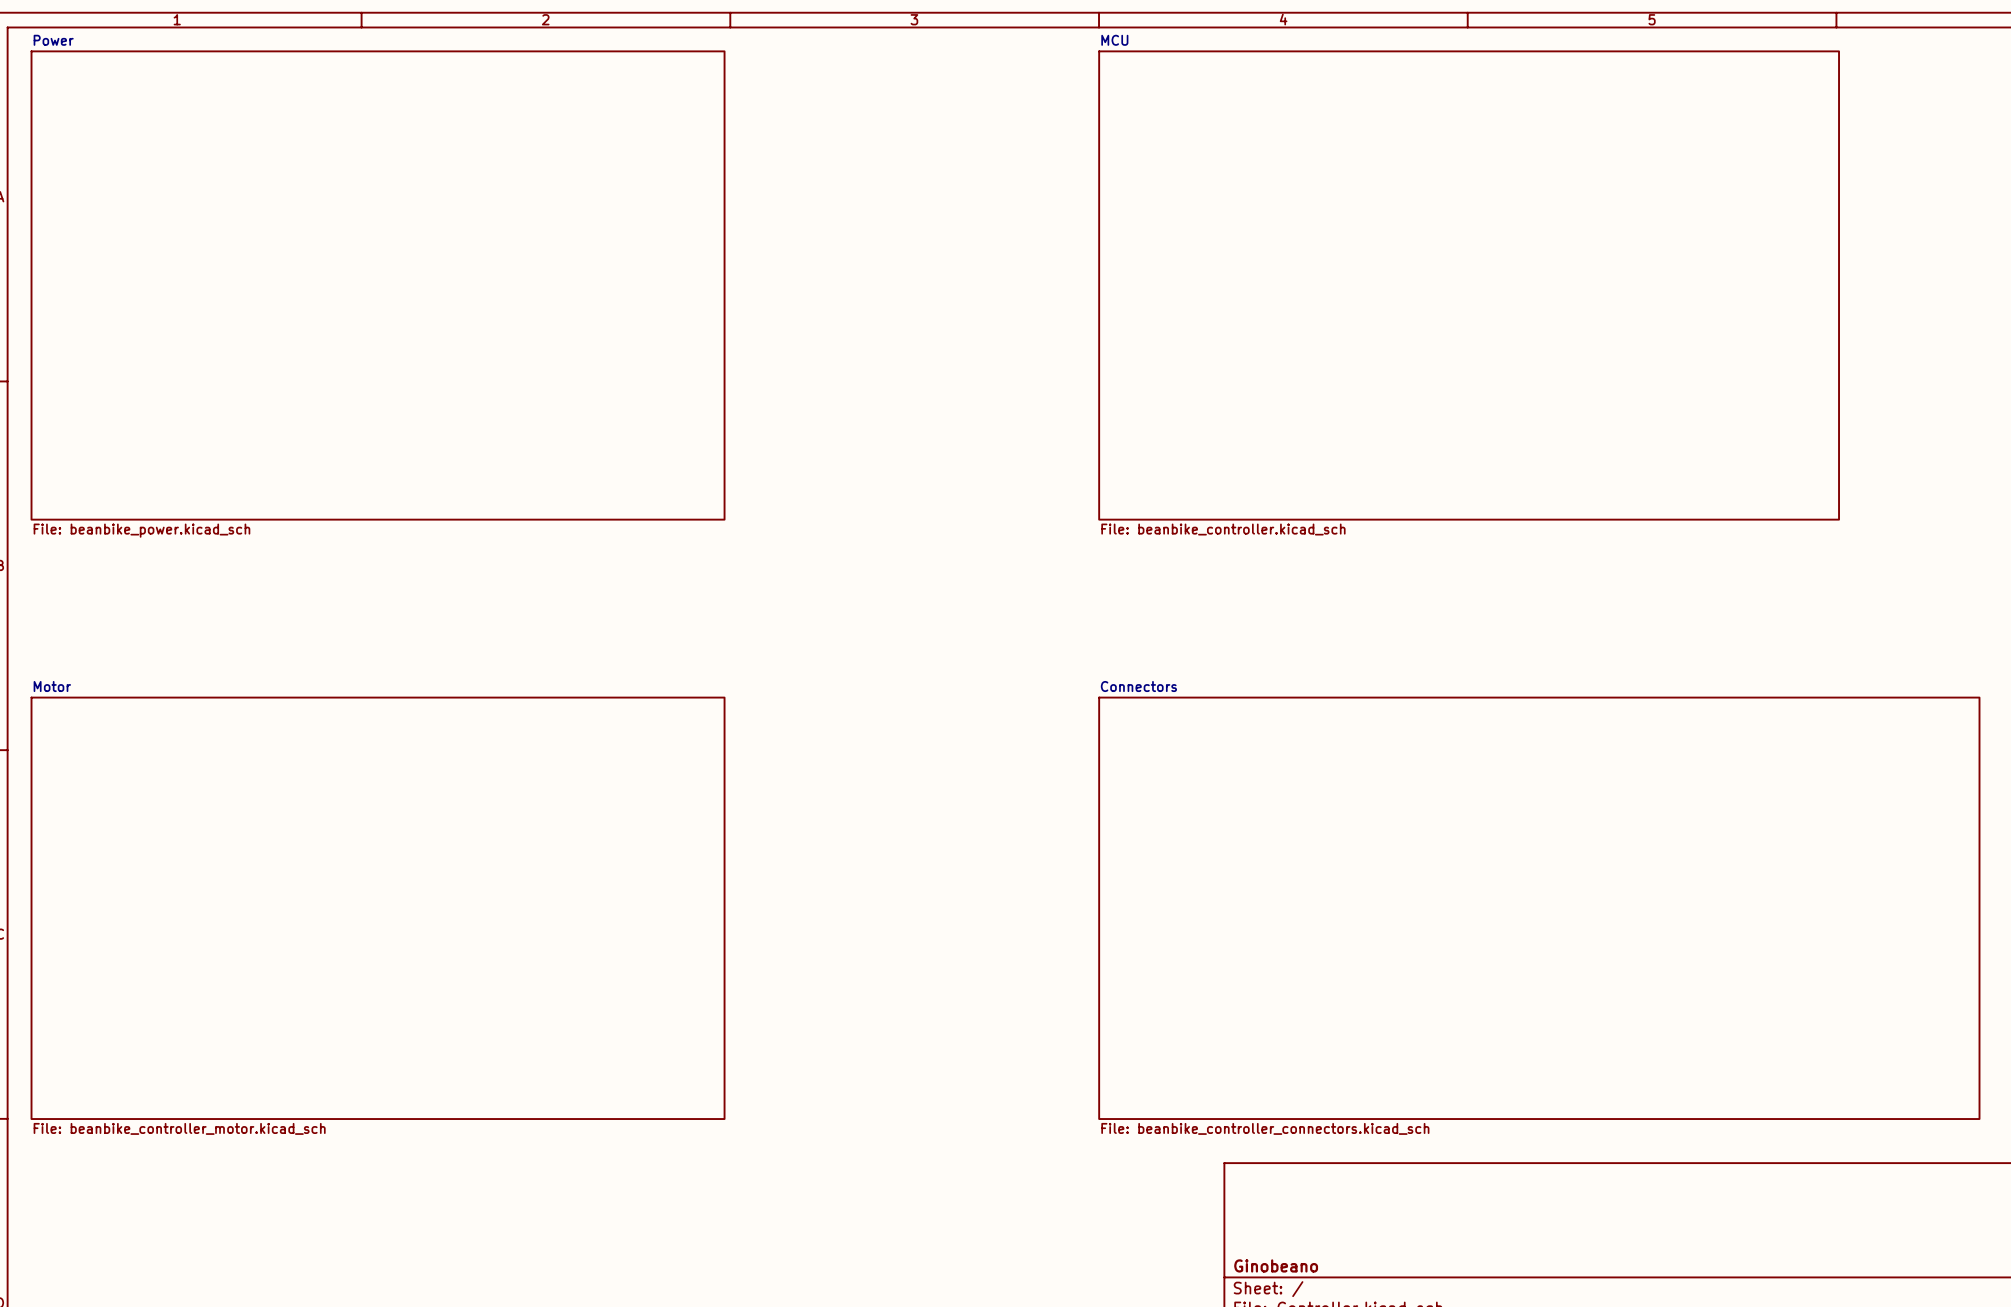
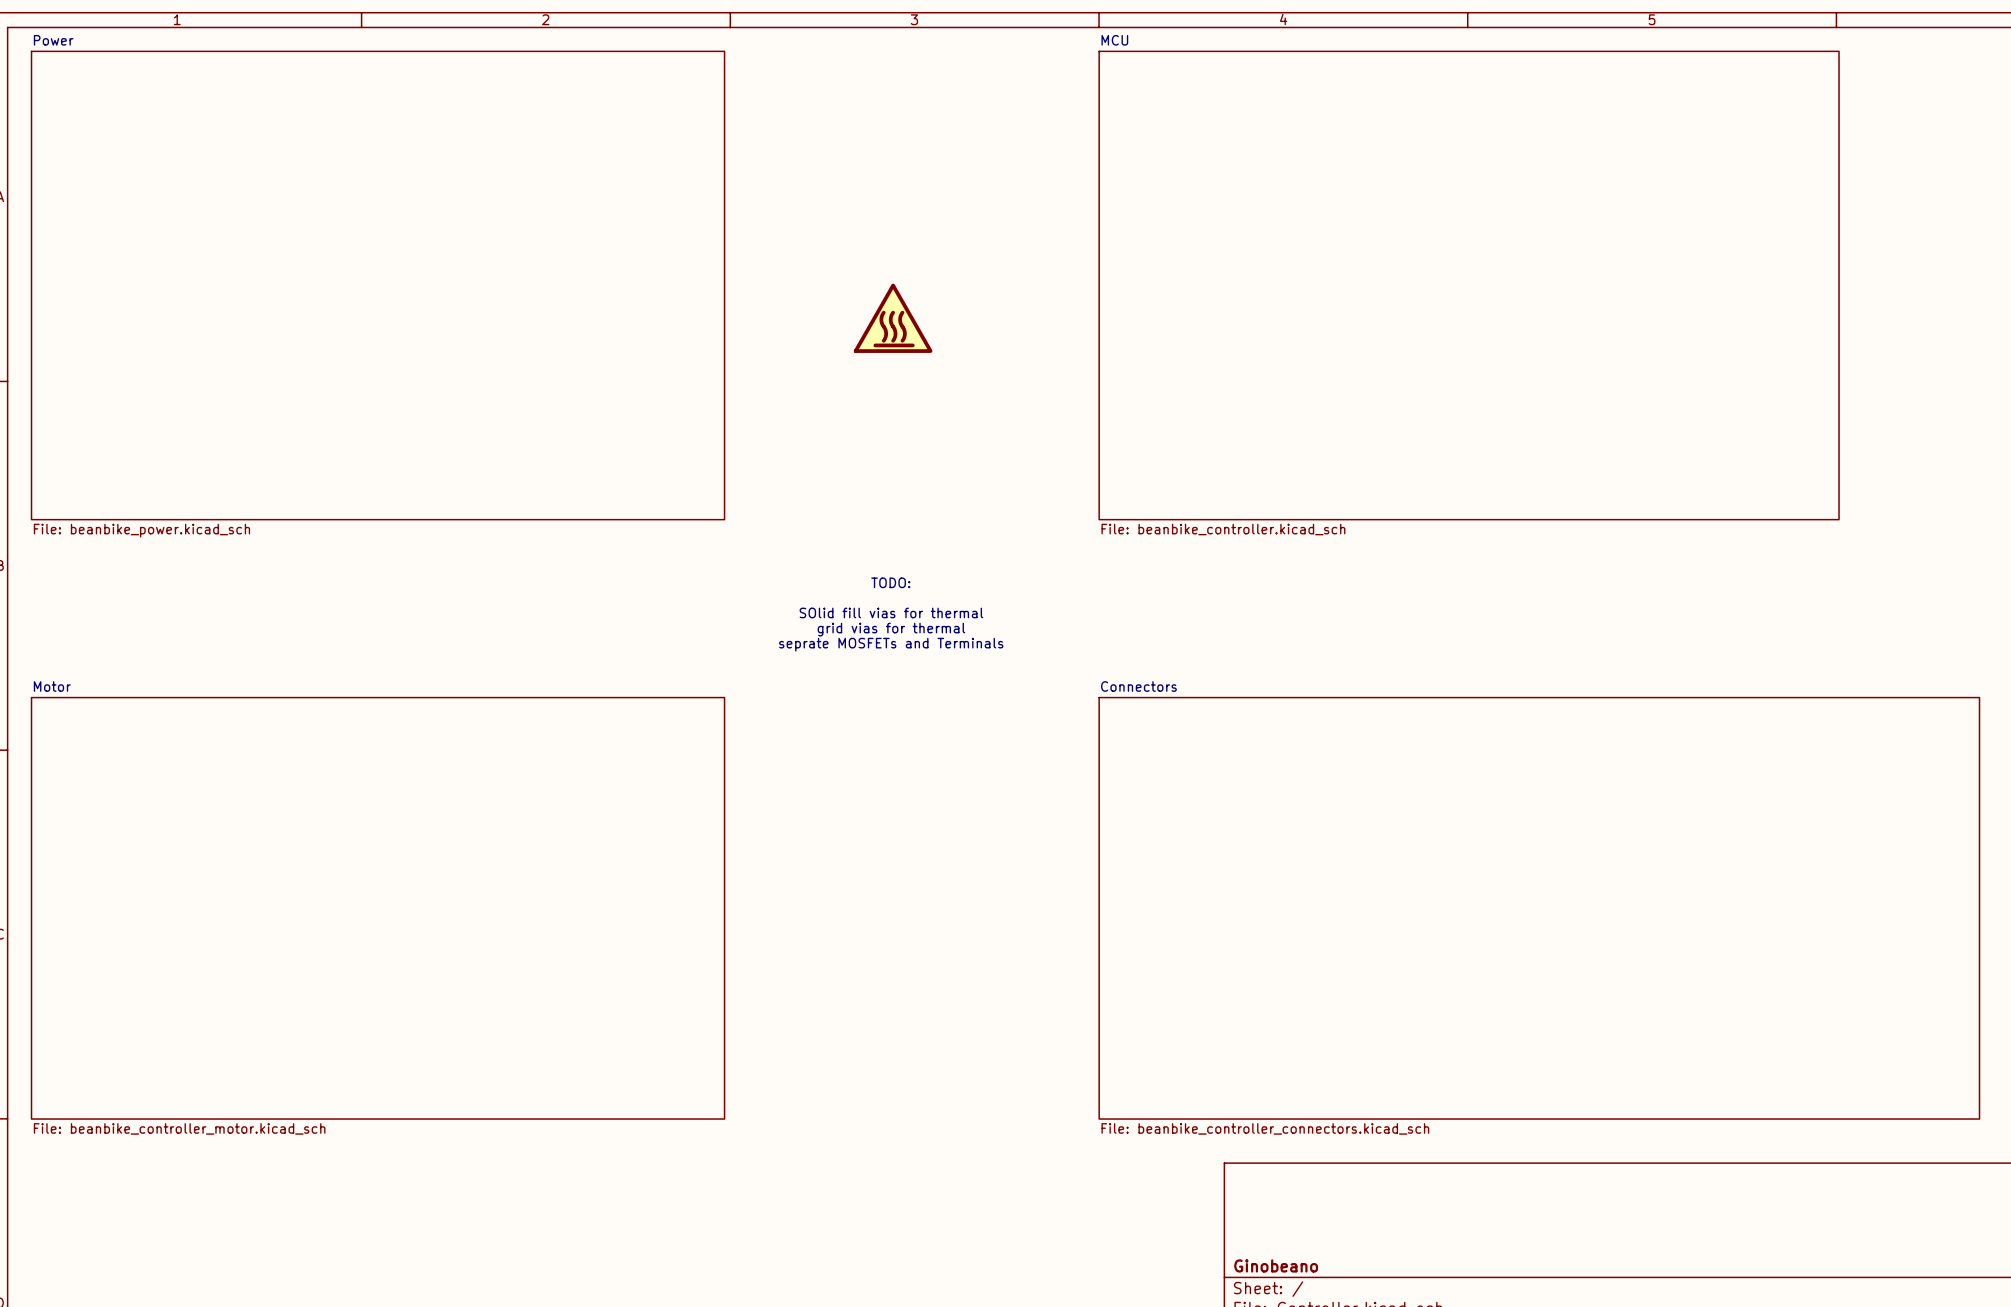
power symbol: none -> (893, 318)
text: none -> TODO: (890, 582)
text: none -> SOlid fill vias for thermal (891, 612)
text: none -> grid vias for thermal (891, 629)
text: none -> seprate MOSFETs and Terminals (891, 644)

